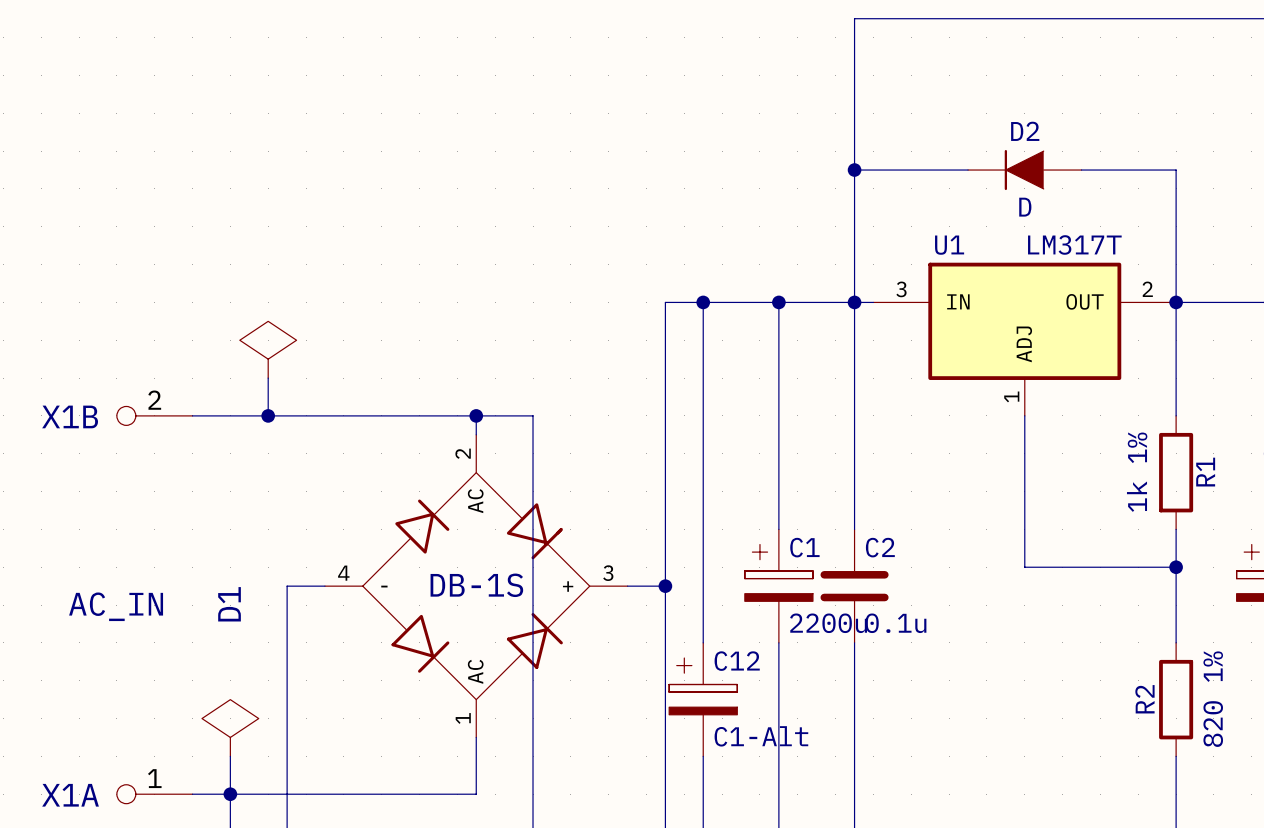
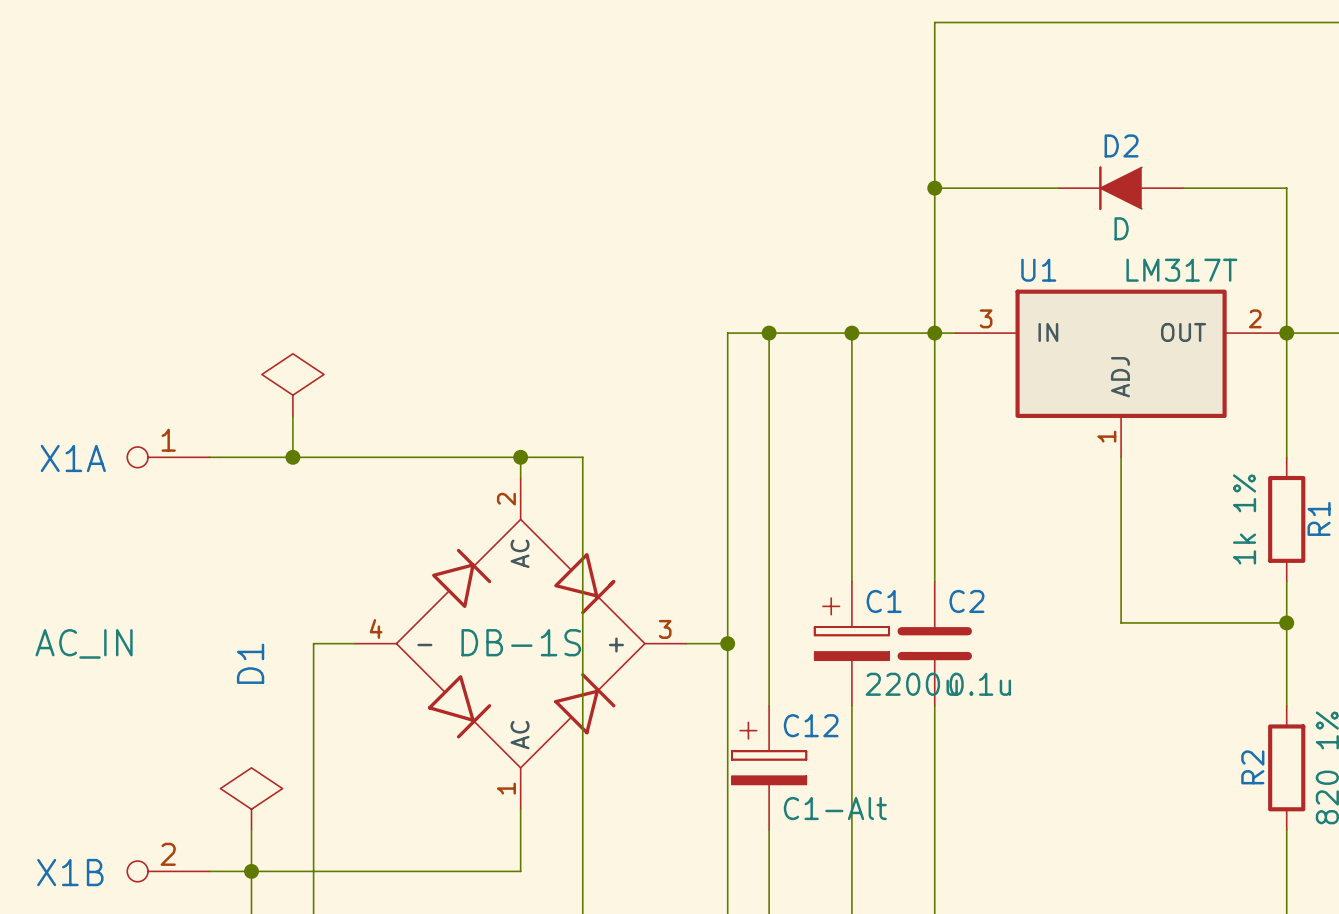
X1B position: (154, 415) -> (168, 871)
X1B value position: AC_IN (116, 606) -> AC_IN (84, 643)
X1A position: (154, 794) -> (168, 457)

